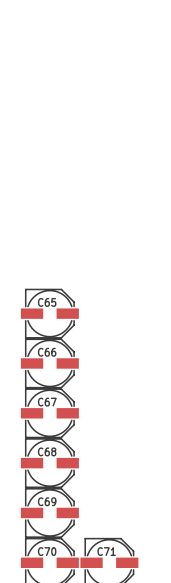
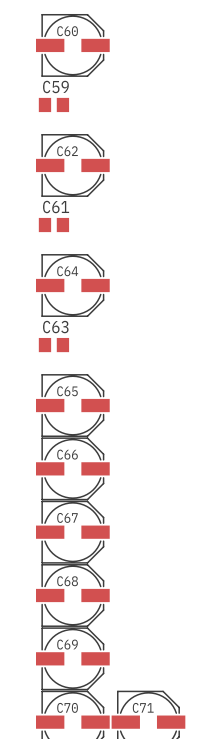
C60: none -> (72, 45)
C59: none -> (53, 104)
C62: none -> (72, 165)
C61: none -> (53, 225)
C64: none -> (72, 285)
C63: none -> (53, 345)

